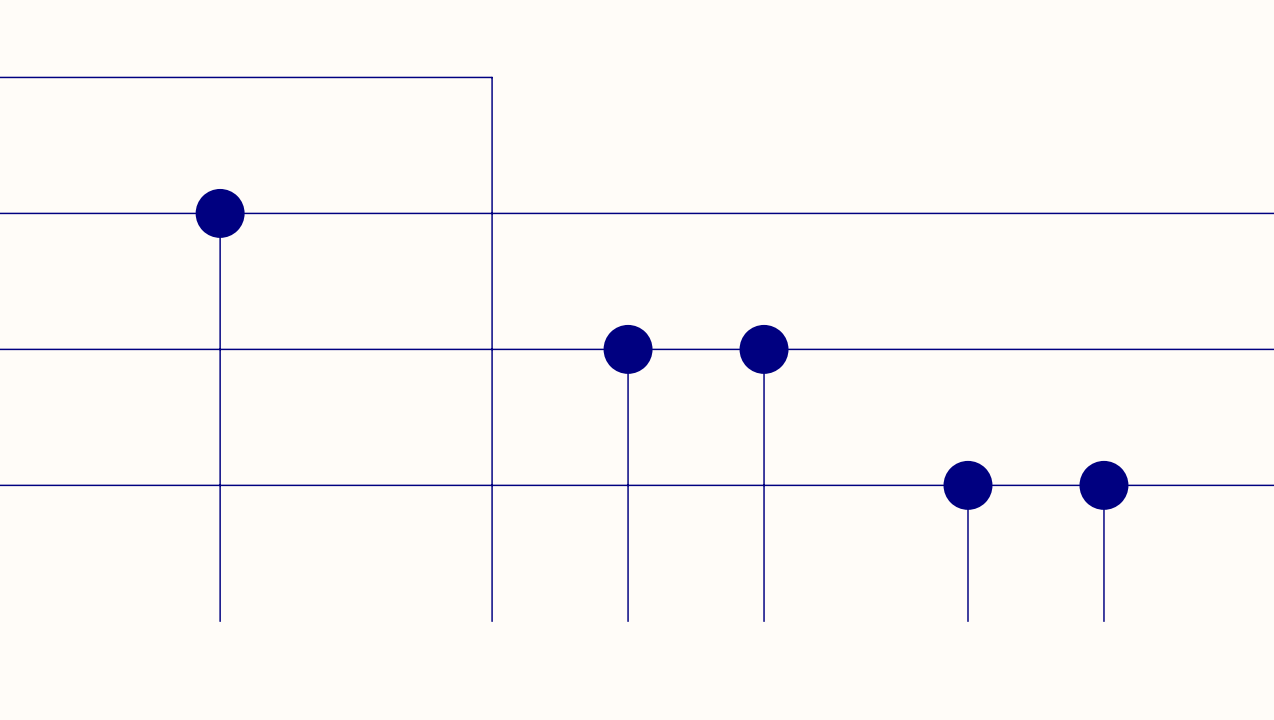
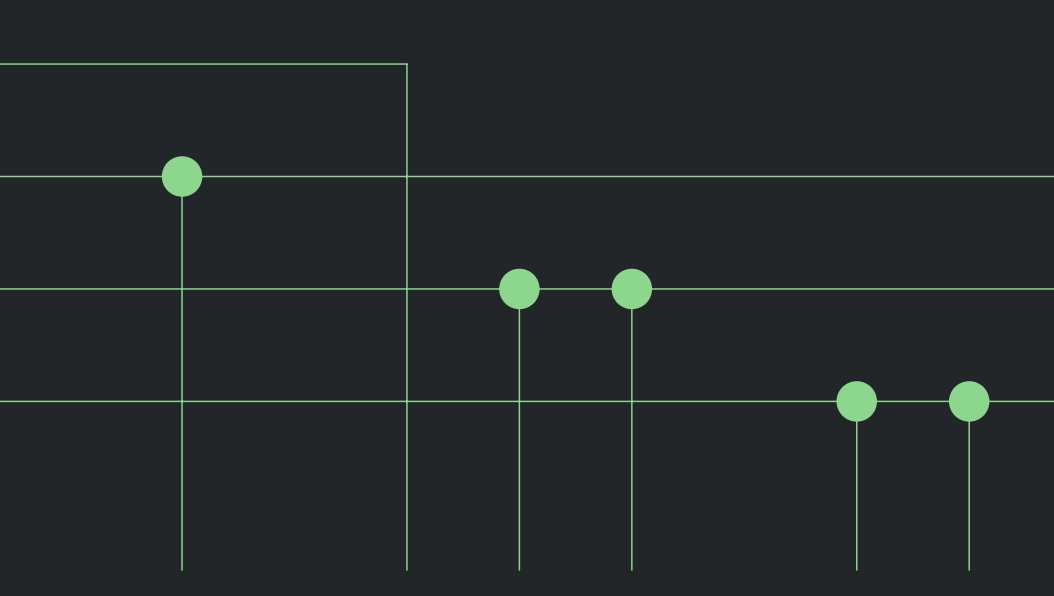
wire: (967, 485) (967, 621) -> none
junction: (967, 485) -> none
wire: none -> (856, 401) (856, 570)
junction: none -> (856, 401)
wire: (1103, 485) (1103, 621) -> none
junction: (1103, 485) -> none
wire: none -> (969, 401) (969, 570)
junction: none -> (969, 401)
wire: none -> (182, 513) (182, 570)
wire: none -> (406, 513) (406, 570)
wire: none -> (519, 513) (519, 570)
wire: none -> (631, 513) (631, 570)

